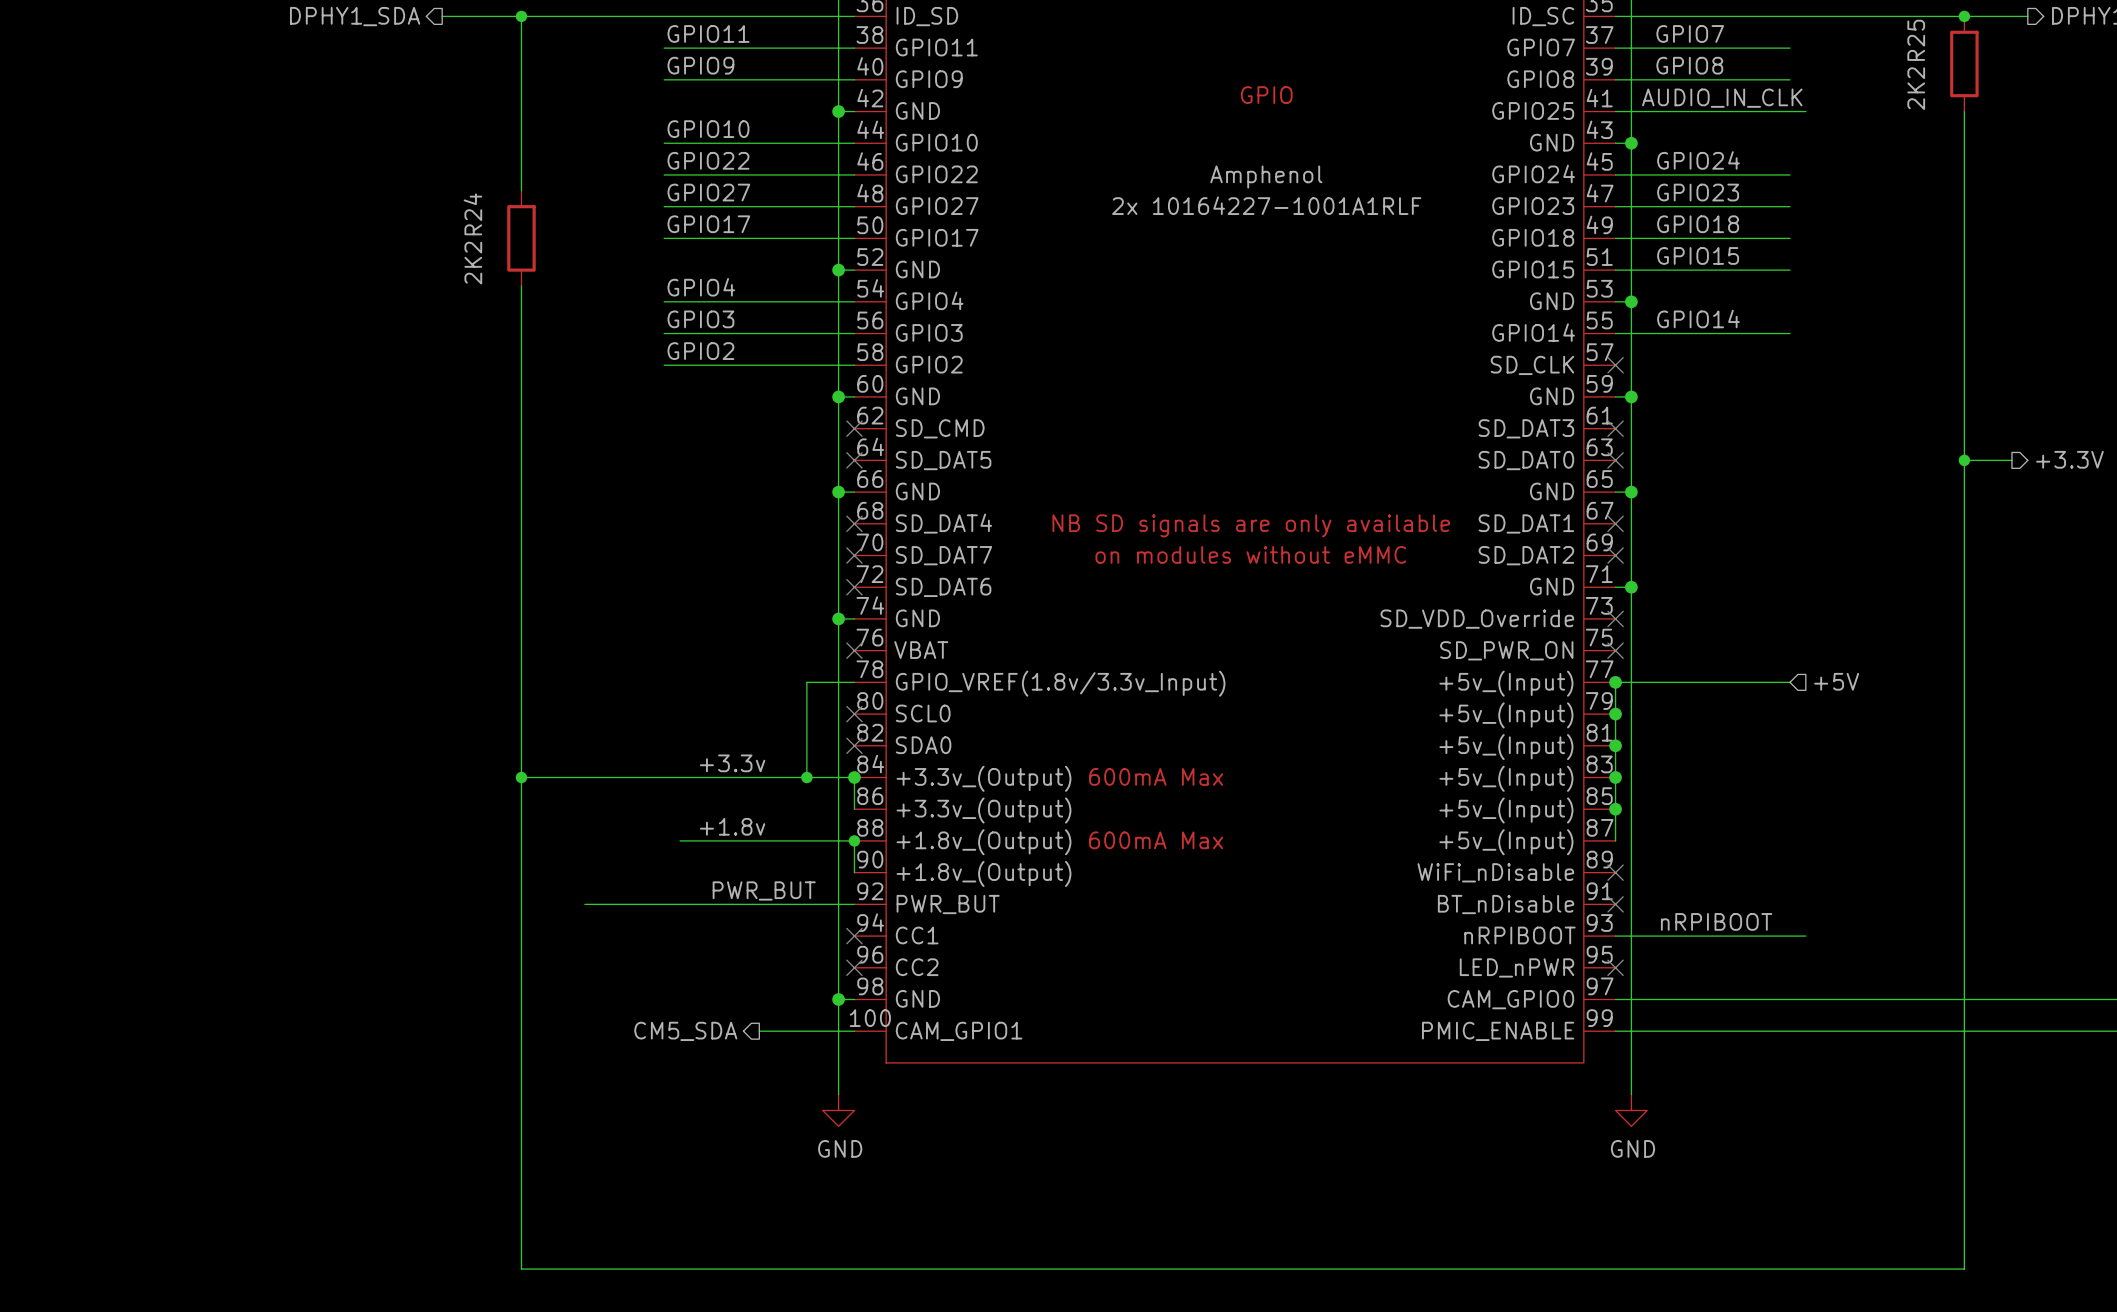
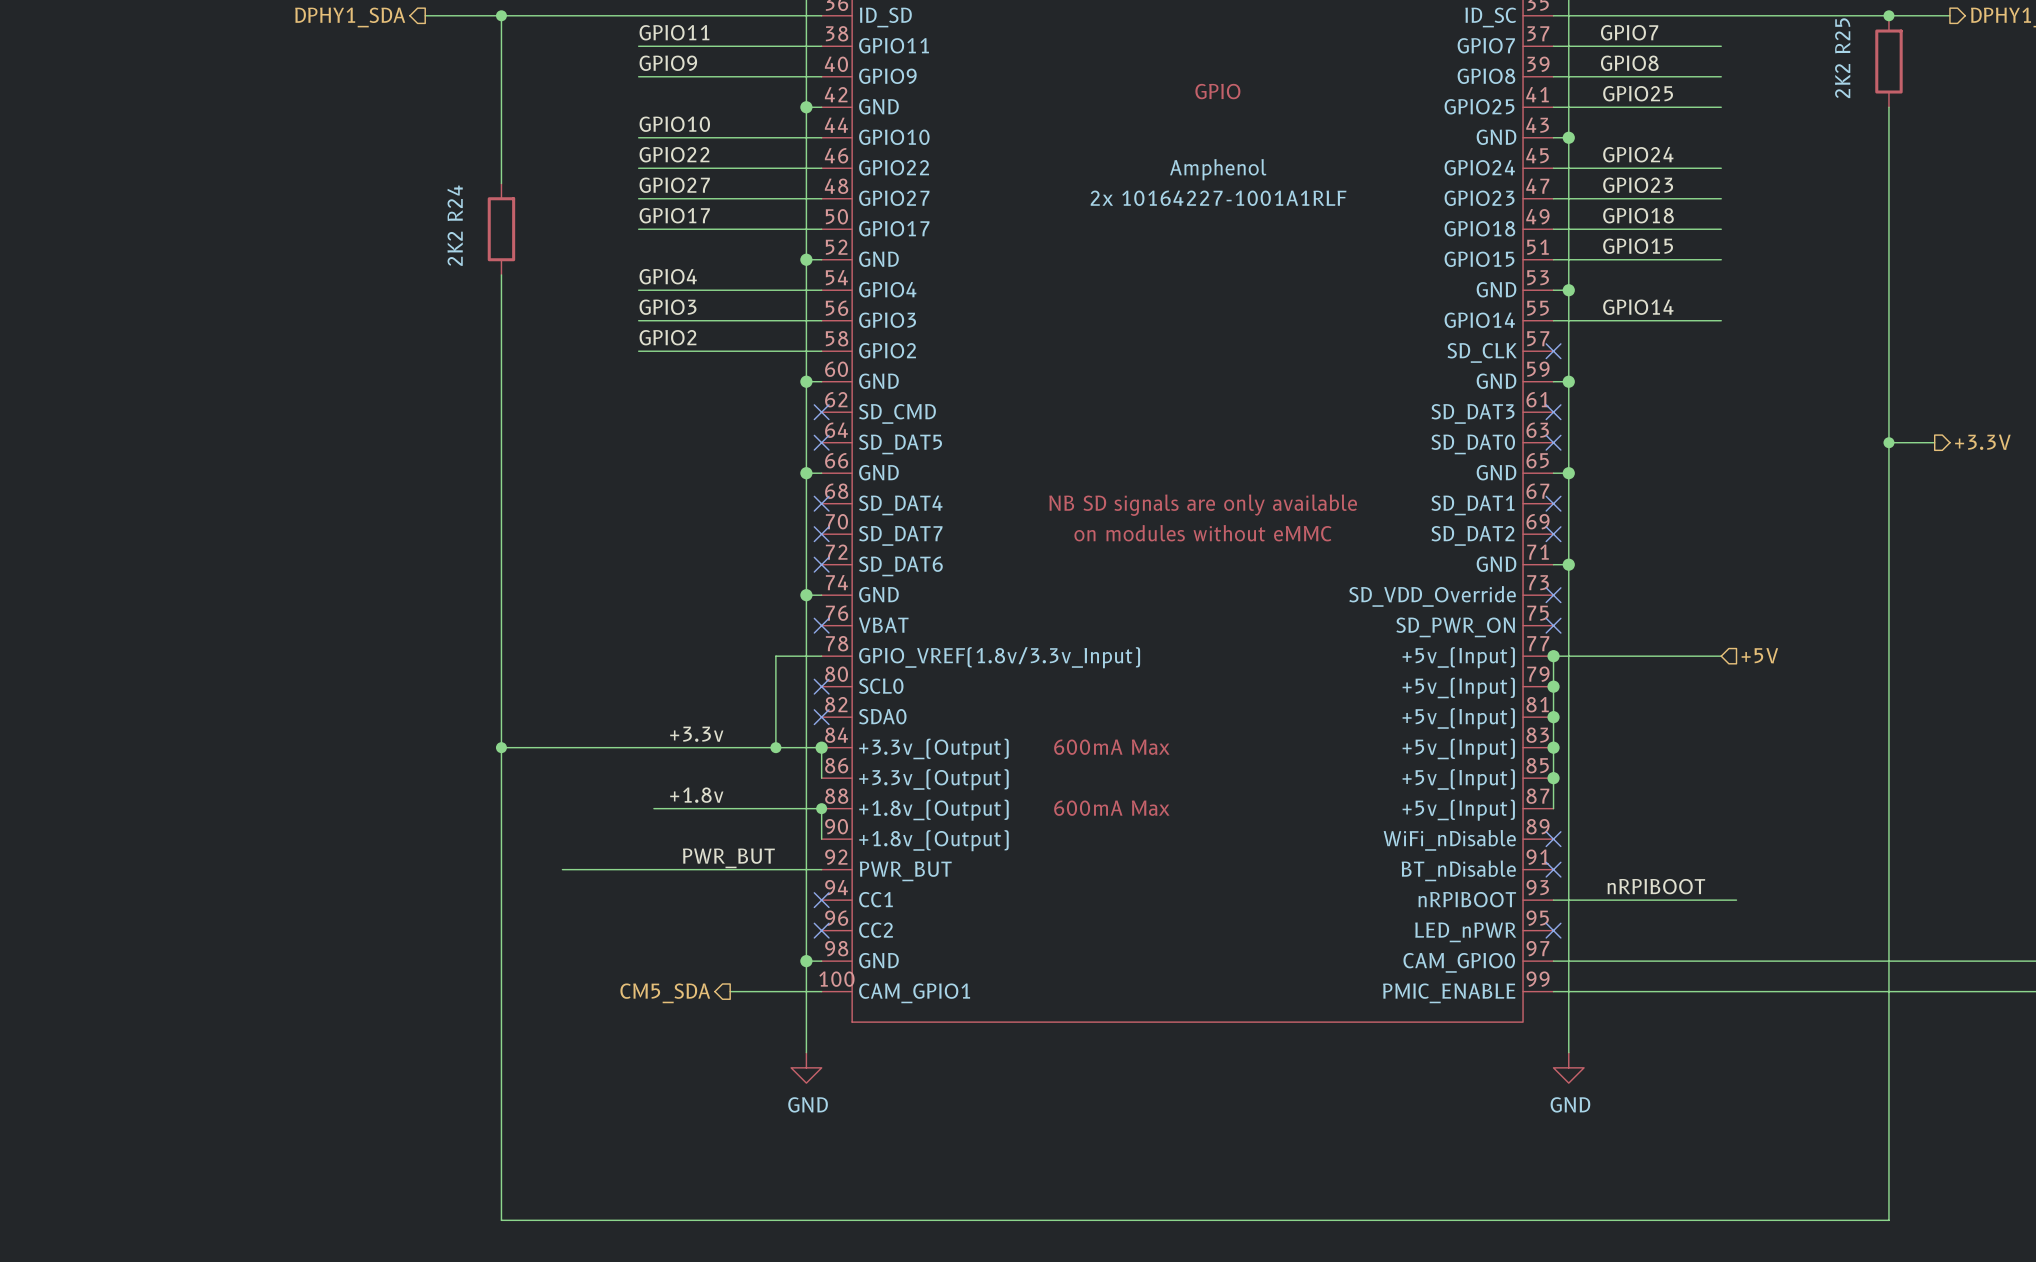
label: none -> GPIO25 (1638, 93)
label: AUDIO_IN_CLK (1722, 98) -> none
wire: (1789, 111) (1805, 111) -> none

